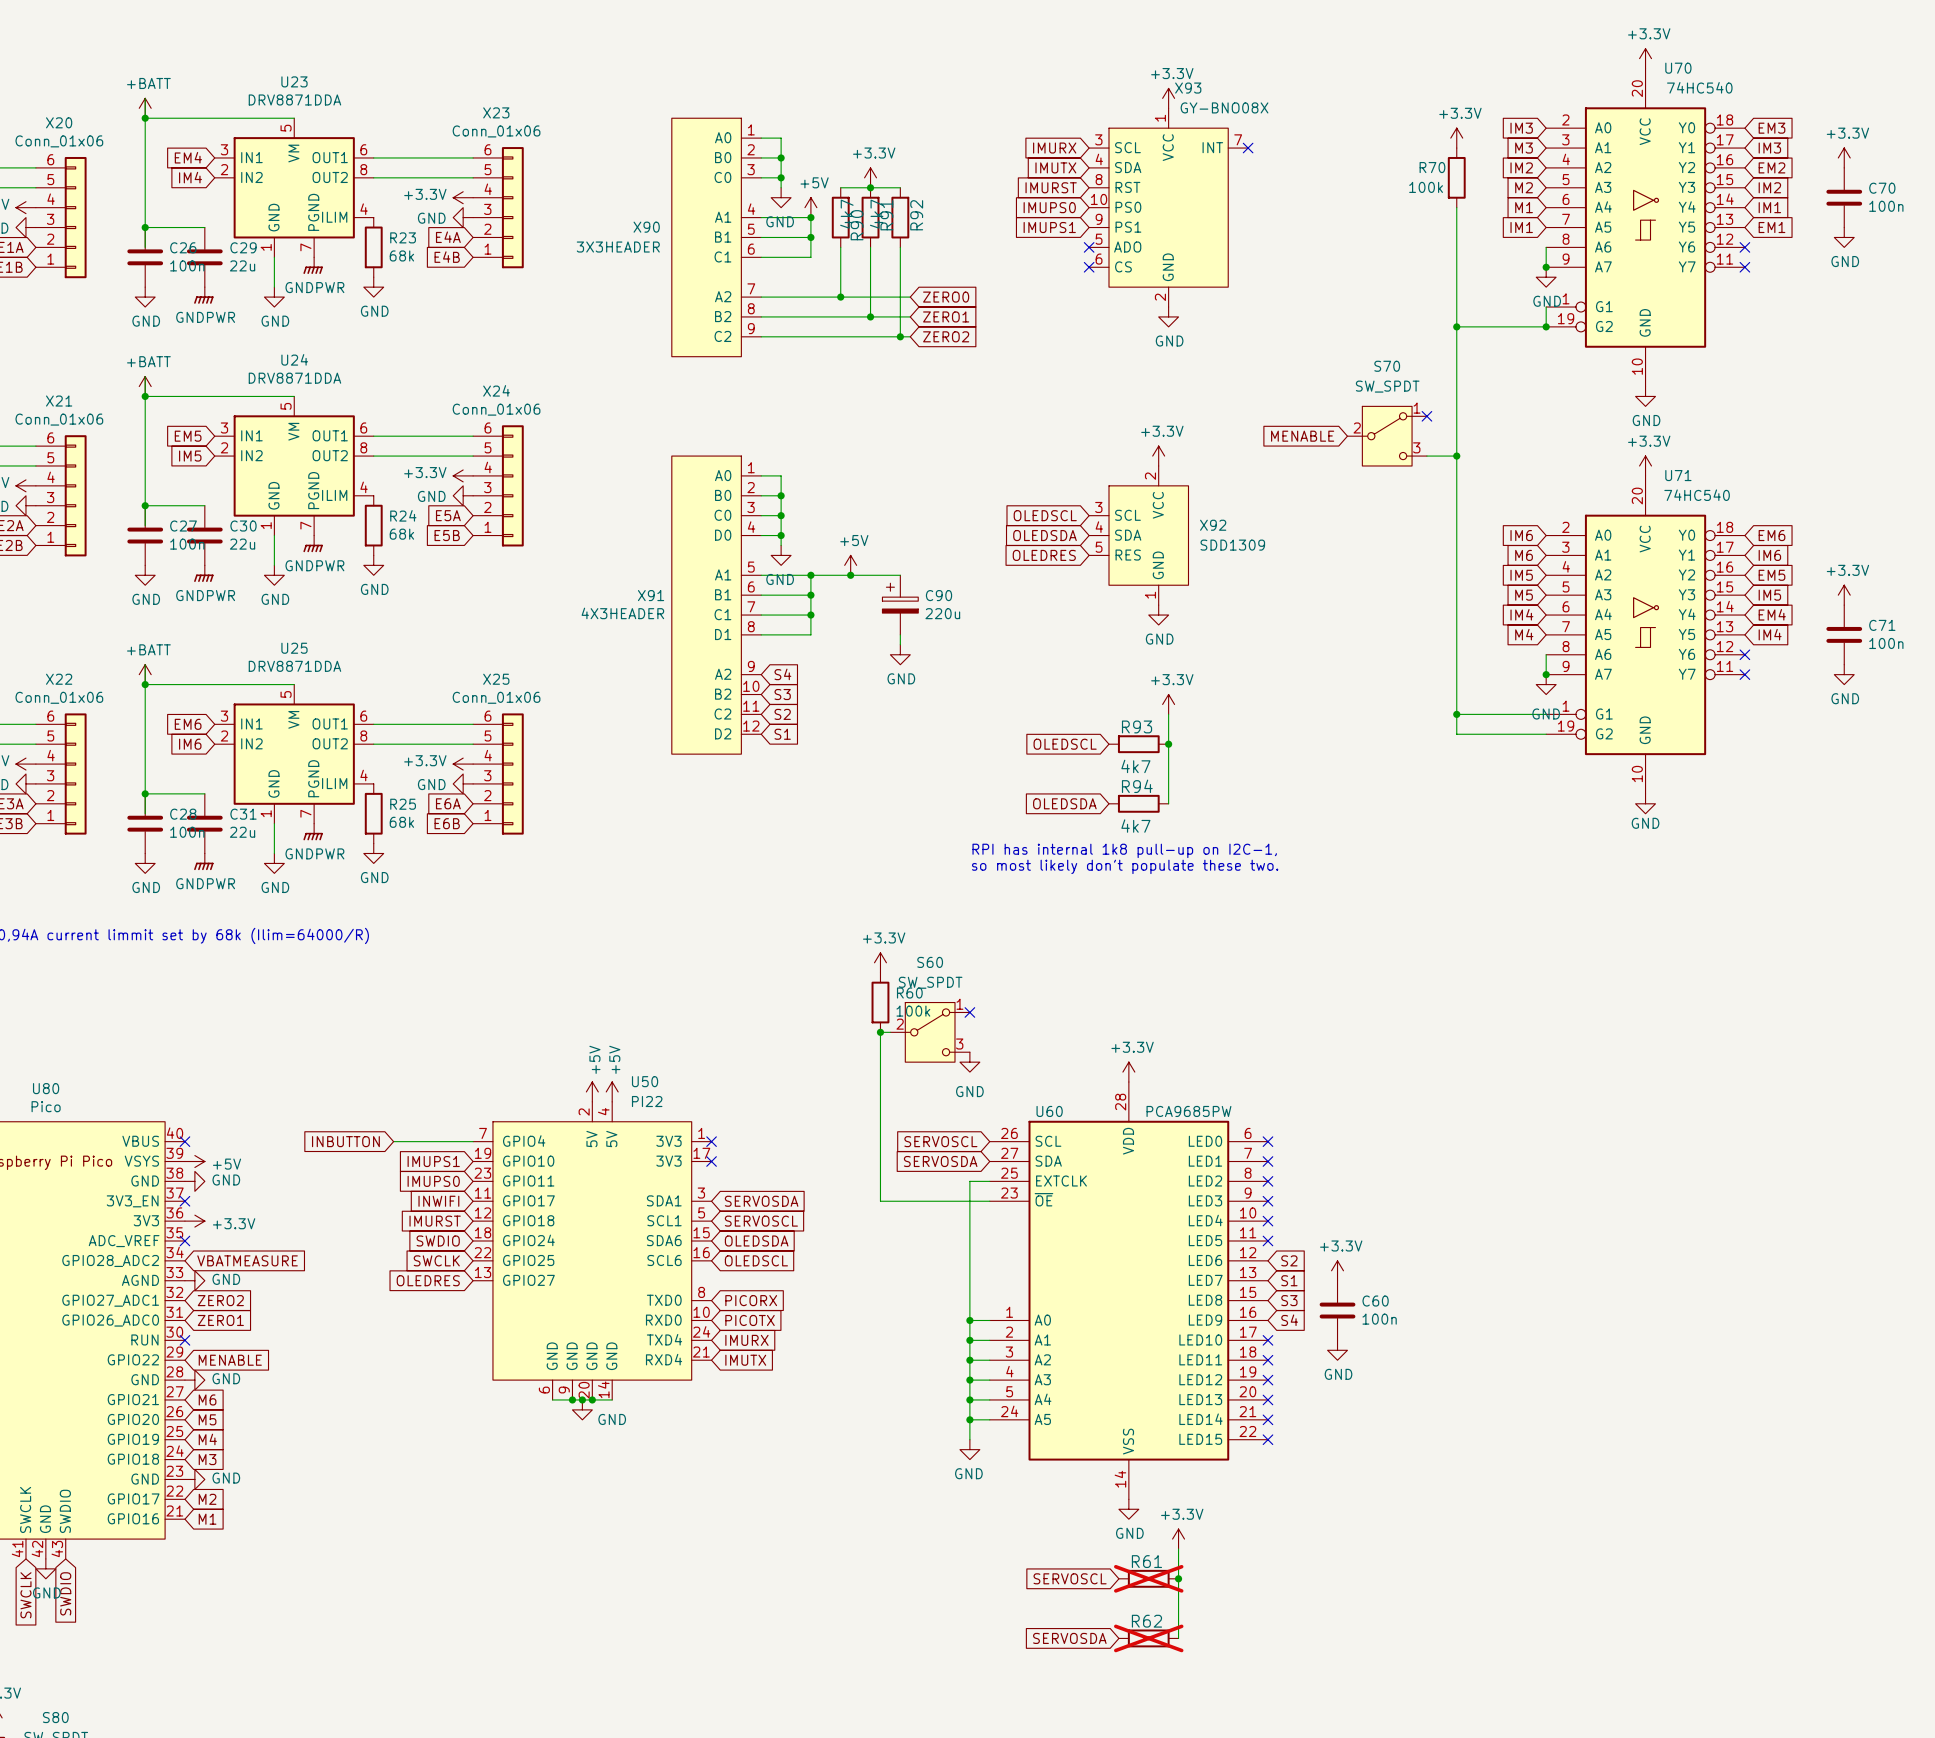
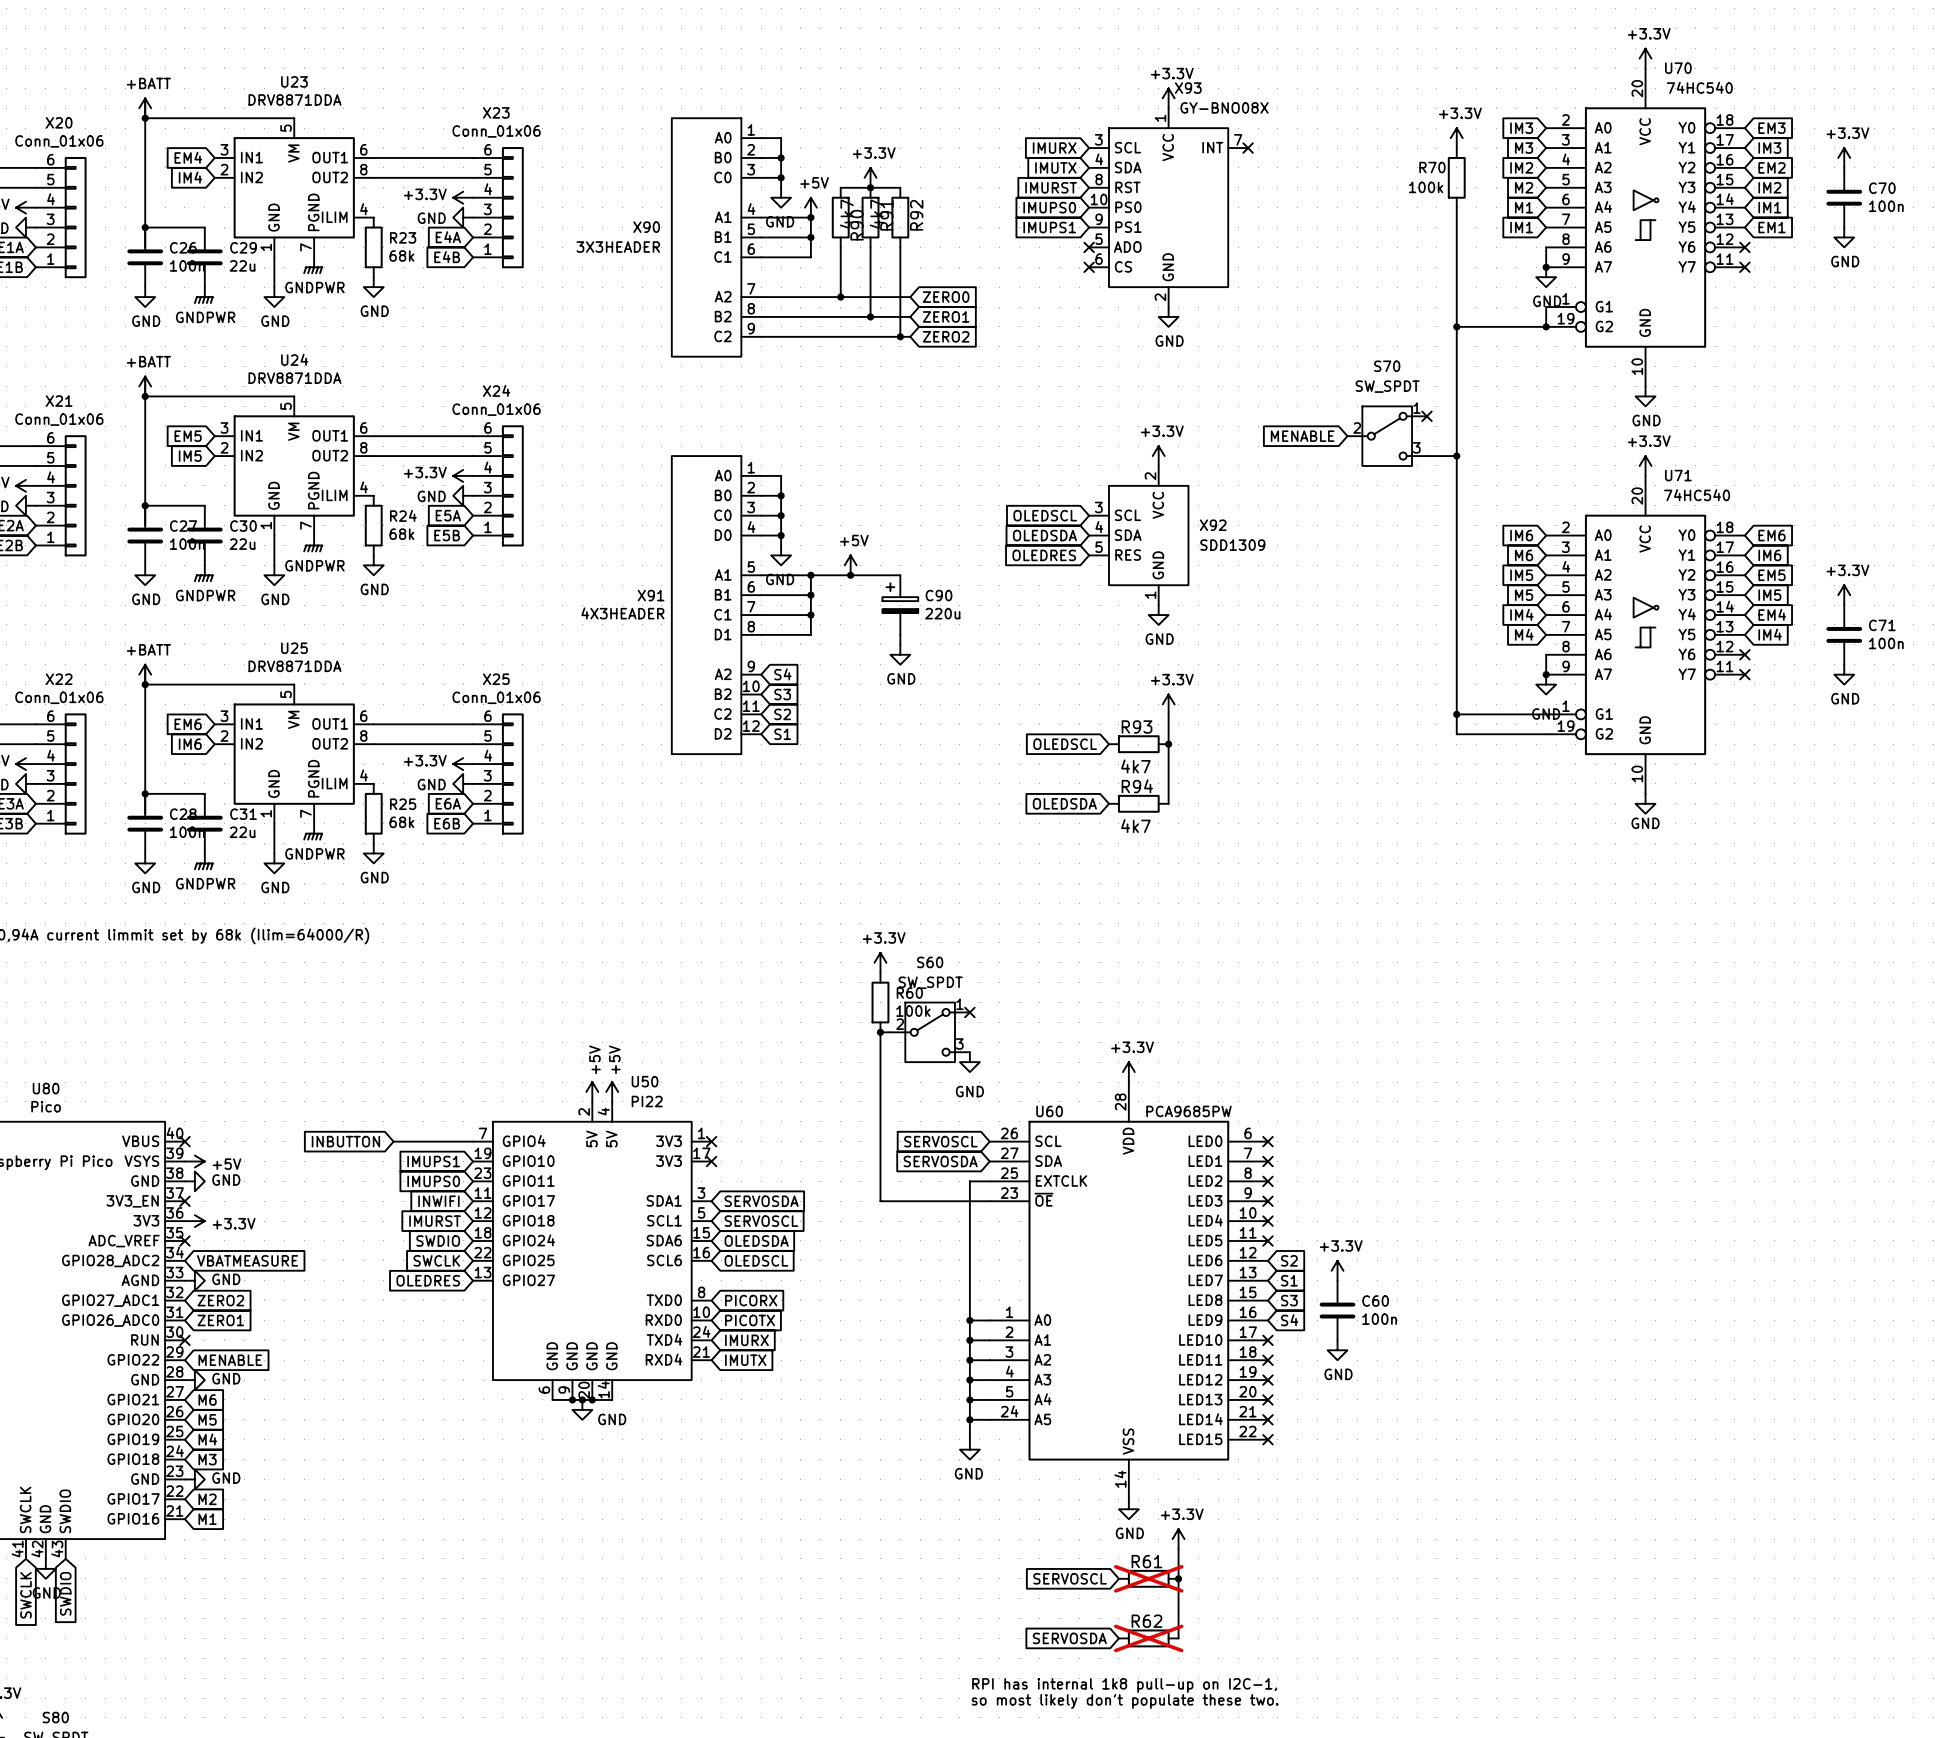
text: RPI has internal 1k8 pull-up on I2C-1, (1124, 850) -> none
text: so most likely don't populate these two. (1125, 866) -> none
text: none -> RPI has internal 1k8 pull-up on I2C-1, (1124, 1685)
text: none -> so most likely don't populate these two. (1125, 1701)

